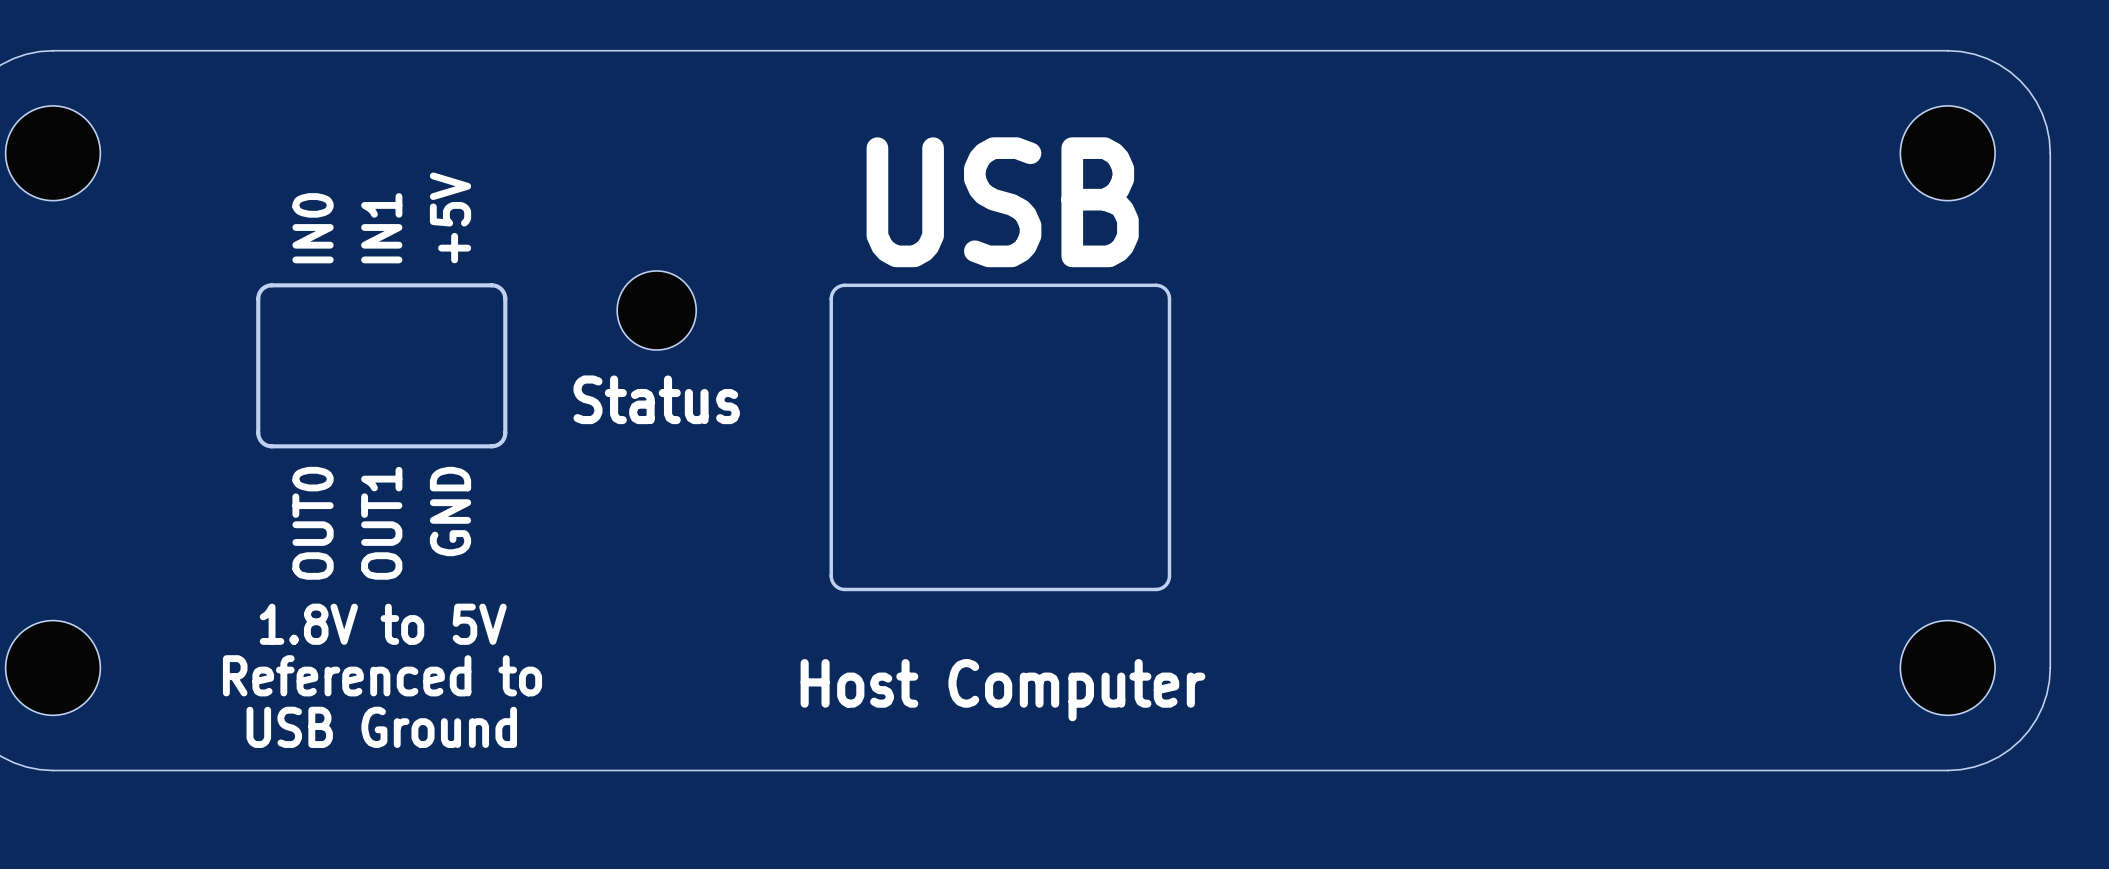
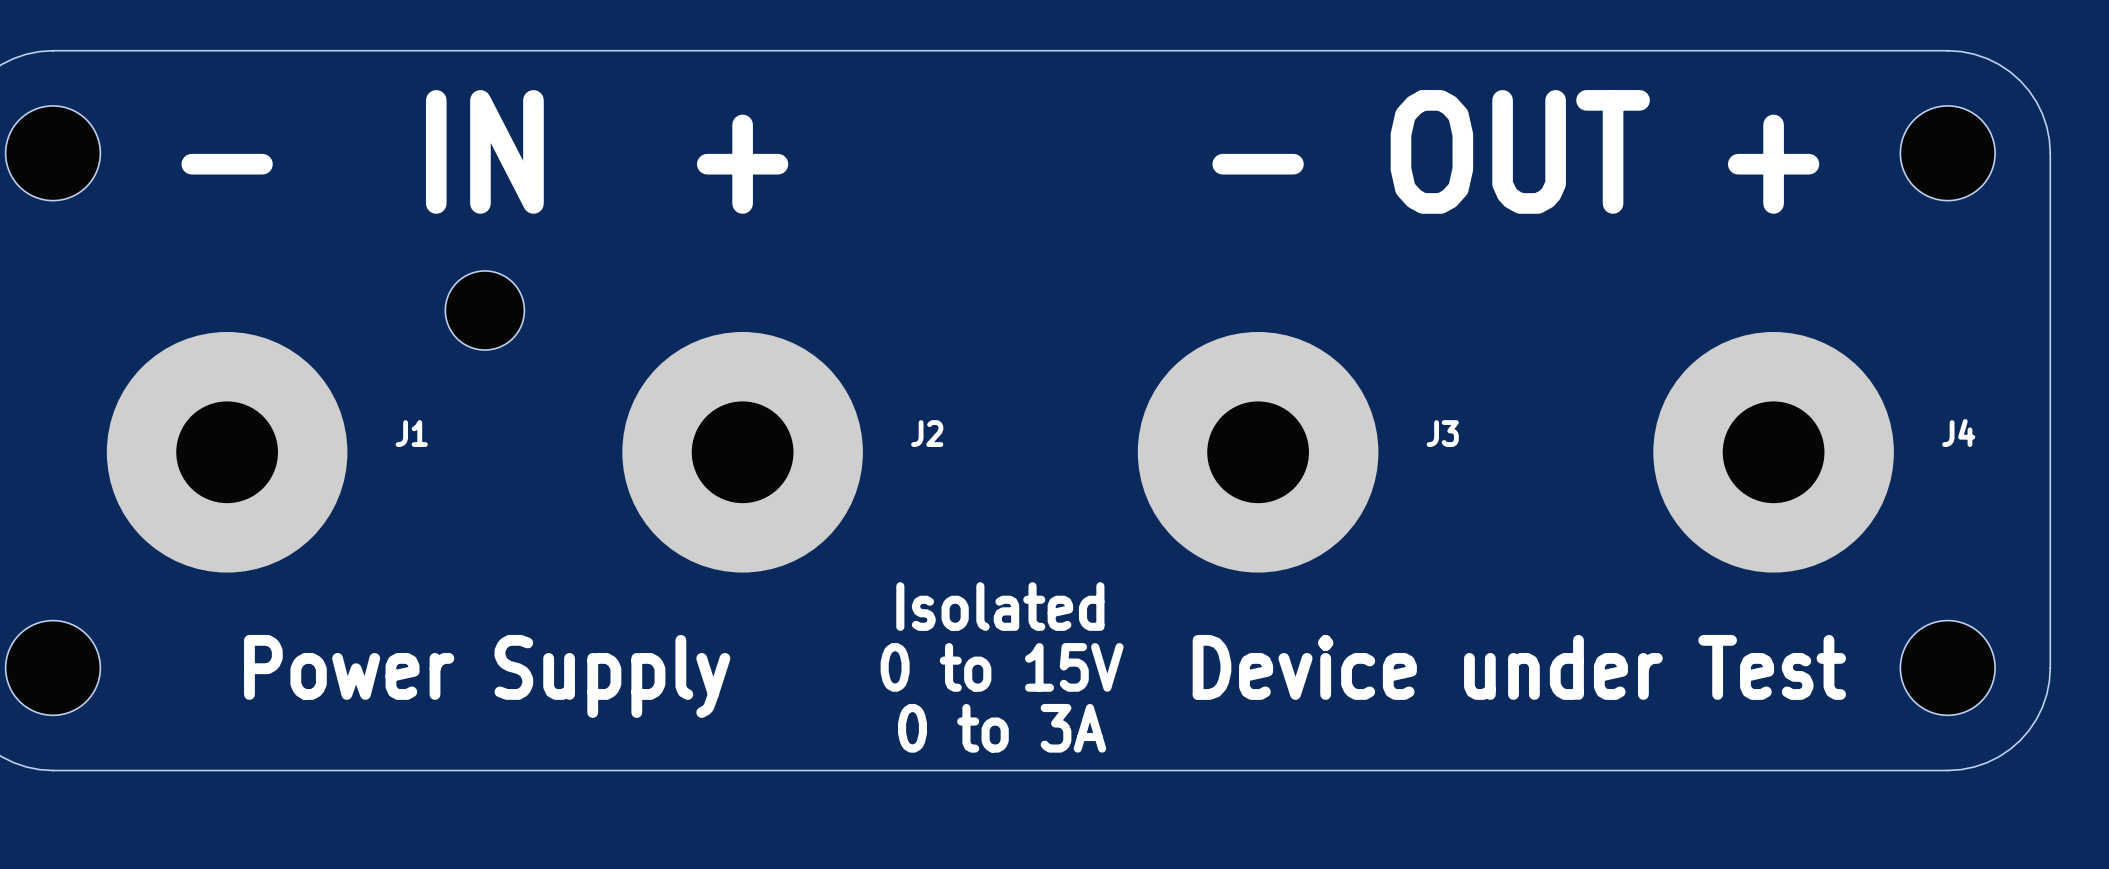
text: none -> OUT (1520, 151)
text: none -> - (227, 164)
text: none -> + (742, 164)
text: none -> - (1258, 164)
text: none -> + (1773, 164)
text: USB (1002, 202) -> none
text: +5V (450, 217) -> none
text: IN0 (313, 228) -> none
text: IN1 (381, 228) -> IN (484, 151)
board edge: (271, 285) (491, 285) (500, 288) (505, 298) (505, 432) (502, 441) (491, 446) (271, 446) (263, 443) (258, 432) (258, 298) (262, 289) (271, 285) -> none
board edge: (844, 285) (1155, 285) (1165, 289) (1169, 298) (1169, 575) (1165, 585) (1155, 589) (844, 589) (835, 585) (831, 575) (831, 298) (835, 289) (844, 285) -> none
part position: (656, 310) -> (484, 310)
text: Status (656, 399) -> none
J1: none -> (227, 452)
J2: none -> (742, 452)
J3: none -> (1258, 452)
J4: none -> (1773, 452)
text: GND (450, 511) -> none
text: OUT0 (313, 523) -> none
text: OUT1 (381, 523) -> none
text: none -> Isolated (1000, 606)
text: 1.8V to 5V (383, 624) -> none
text: none -> Device under Test (1519, 667)
text: Referenced to (382, 675) -> none
text: none -> Power Supply (487, 676)
text: Host Computer (1002, 690) -> 0 to 15V (1002, 667)
text: USB Ground (381, 727) -> none
text: none -> 0 to 3A (1002, 728)

